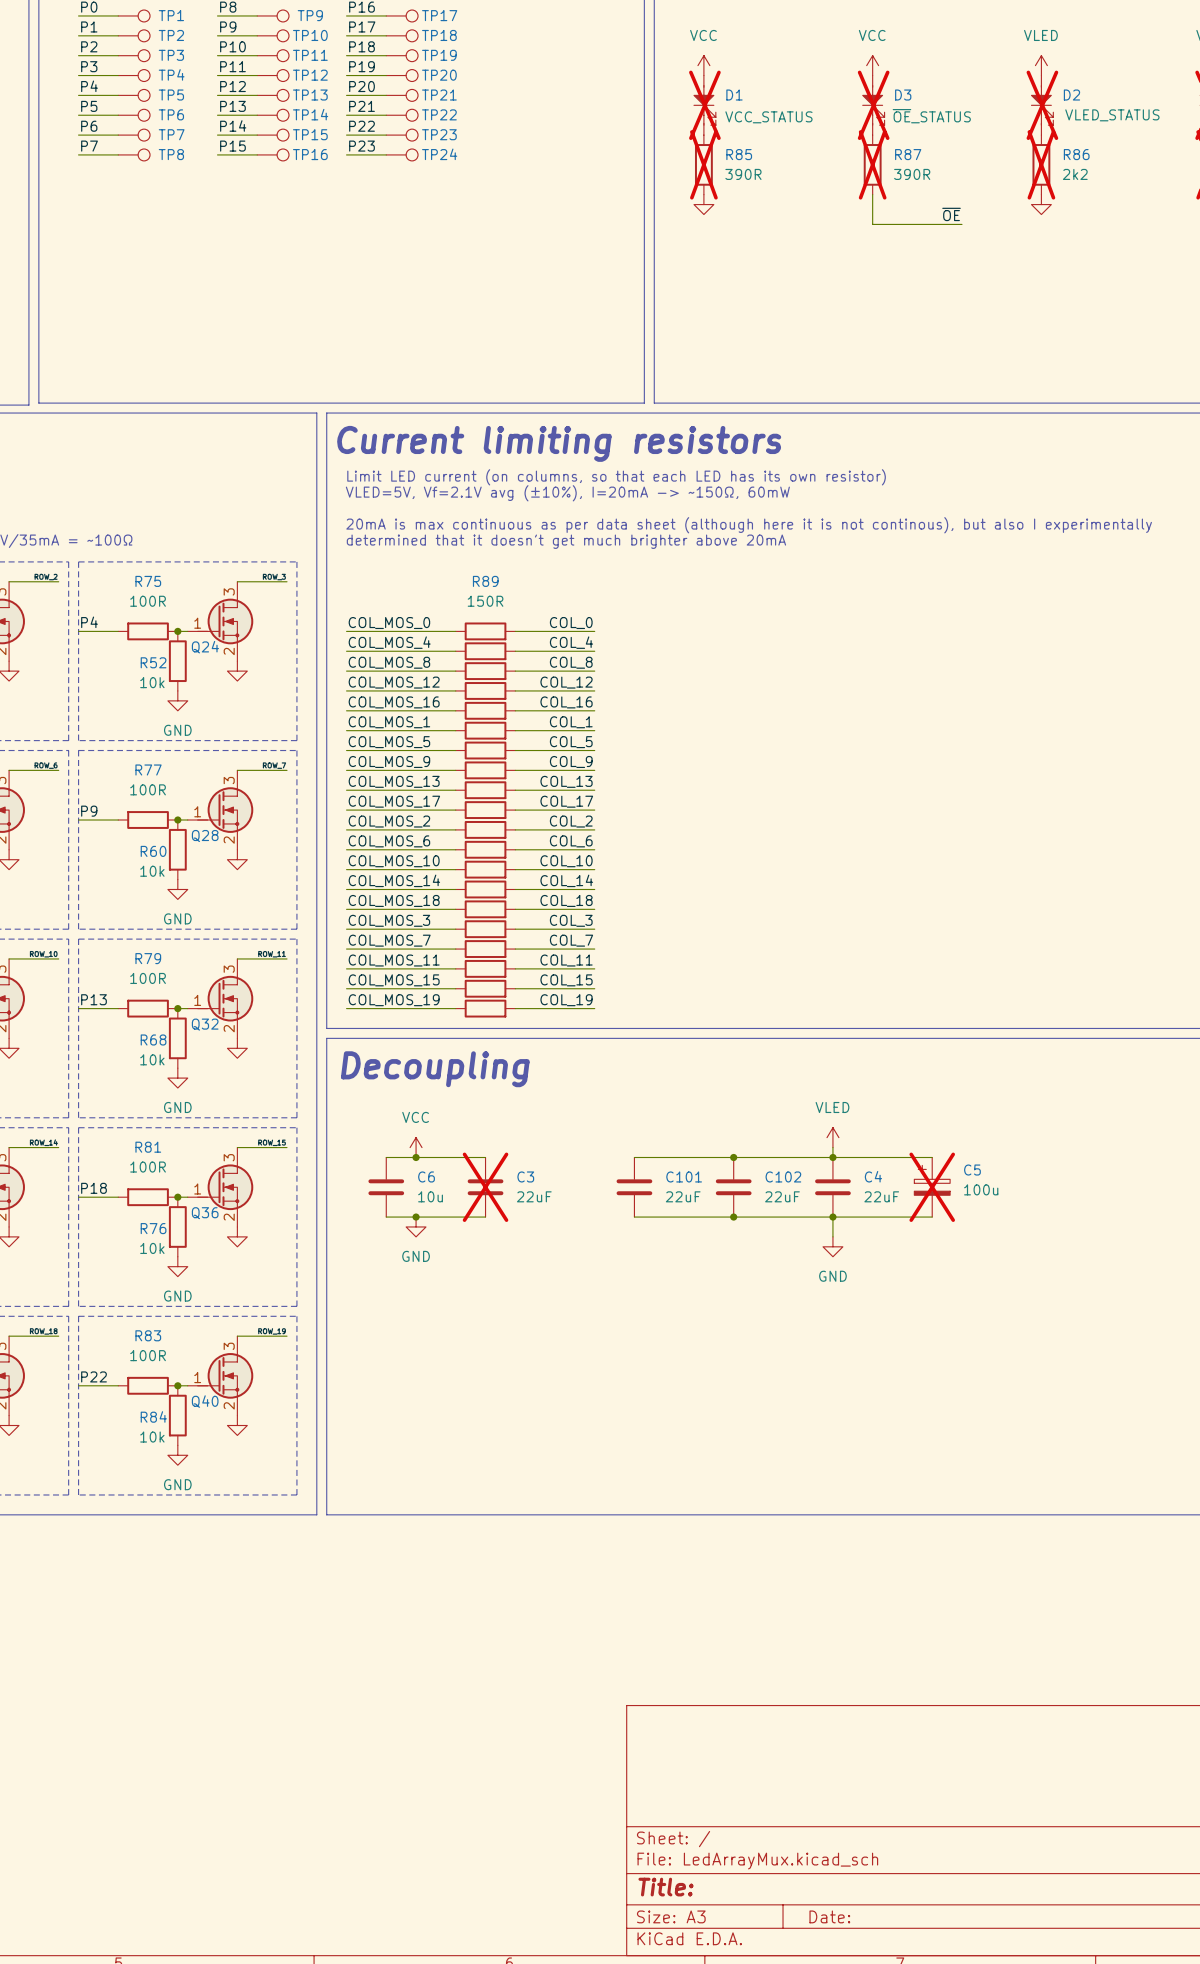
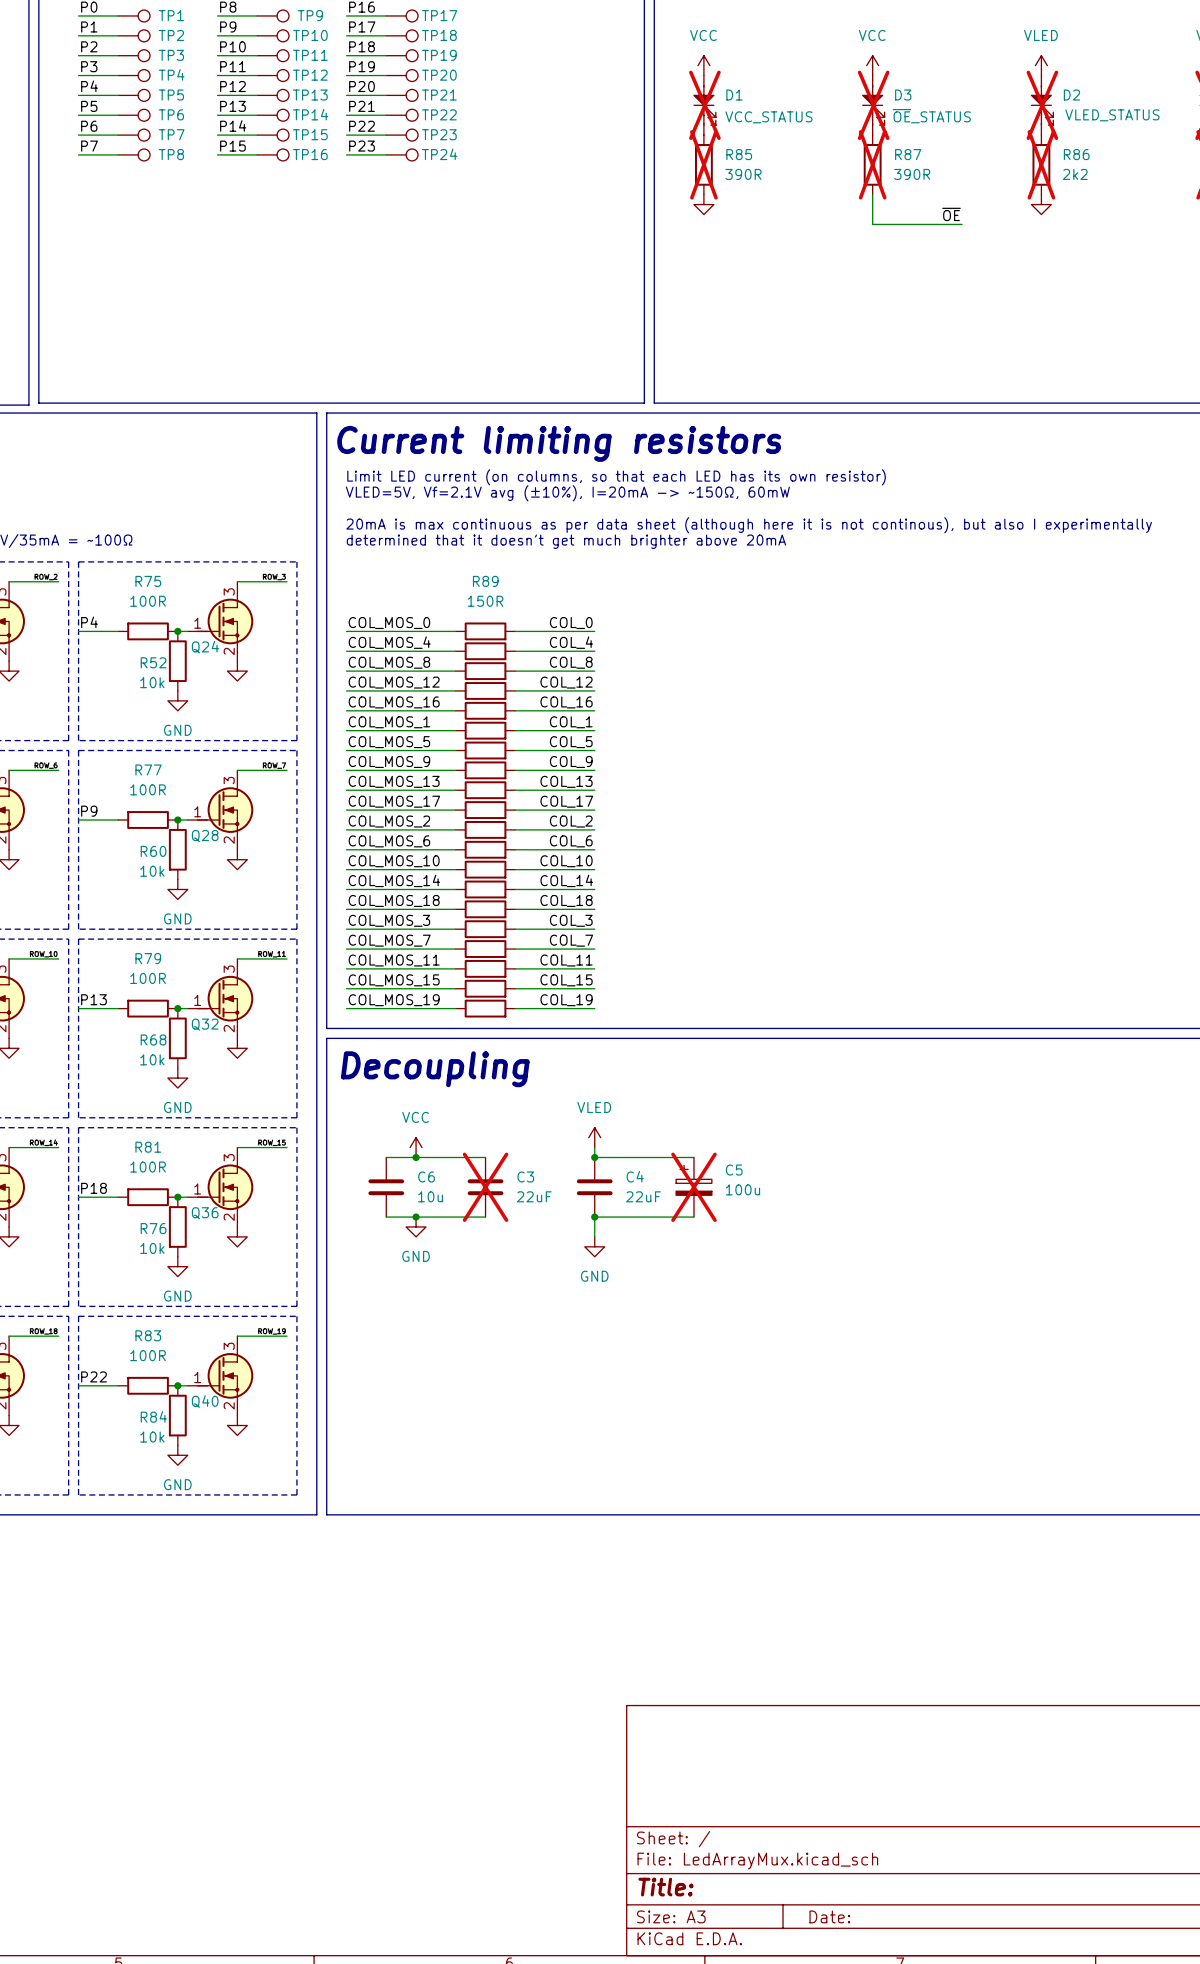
power symbol: none -> VLED (594, 1137)
power symbol: VLED (832, 1137) -> none
wire: none -> (594, 1147) (594, 1157) (634, 1157)
wire: (832, 1147) (832, 1157) -> none
junction: none -> (594, 1157)
wire: (693, 1157) (932, 1157) -> none
junction: (733, 1157) -> none
junction: (832, 1157) -> none
C101: 22uF (634, 1187) -> none
C102: 22uF (733, 1187) -> none
C4 position: (832, 1187) -> (594, 1187)
C5 position: (932, 1187) -> (693, 1187)
junction: none -> (594, 1217)
wire: none -> (634, 1217) (594, 1217) (594, 1236)
wire: (693, 1217) (932, 1217) -> none
junction: (733, 1217) -> none
wire: (832, 1217) (832, 1236) -> none
junction: (832, 1217) -> none
power symbol: none -> GND (594, 1246)
power symbol: GND (832, 1246) -> none

